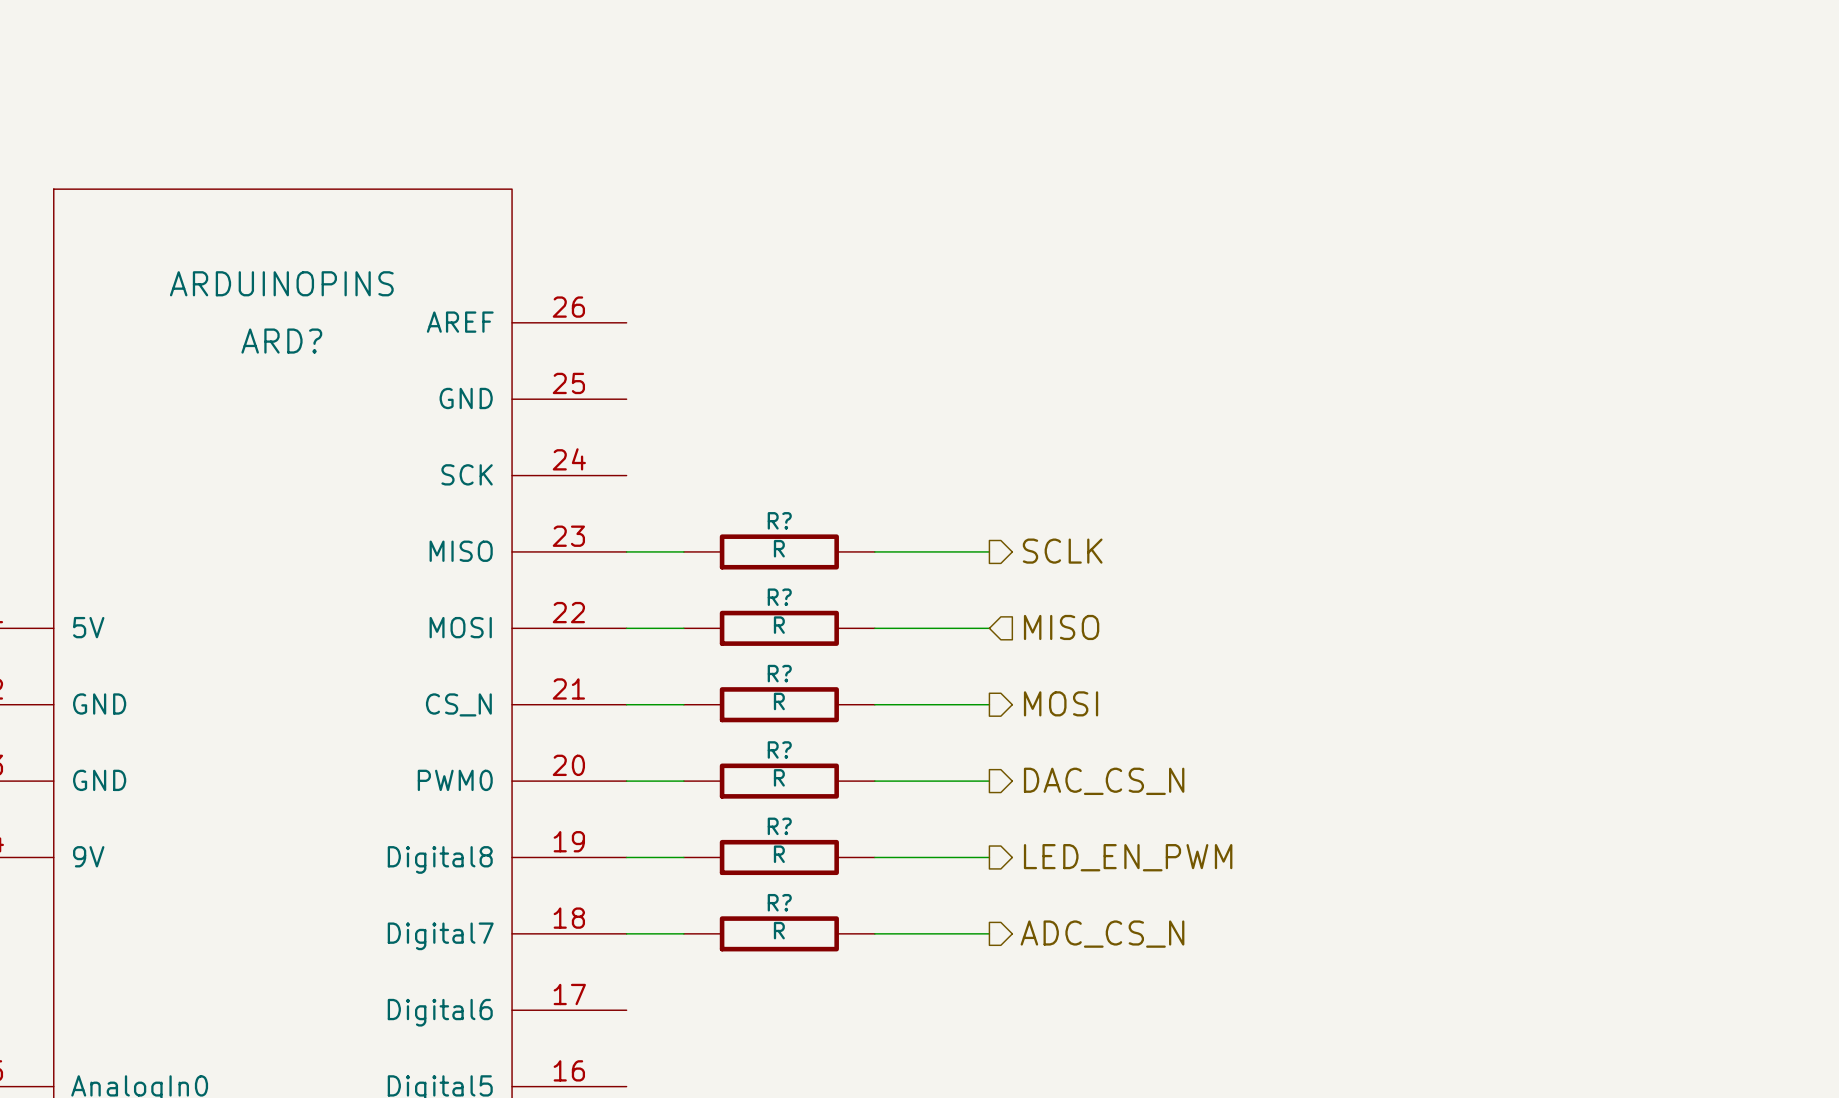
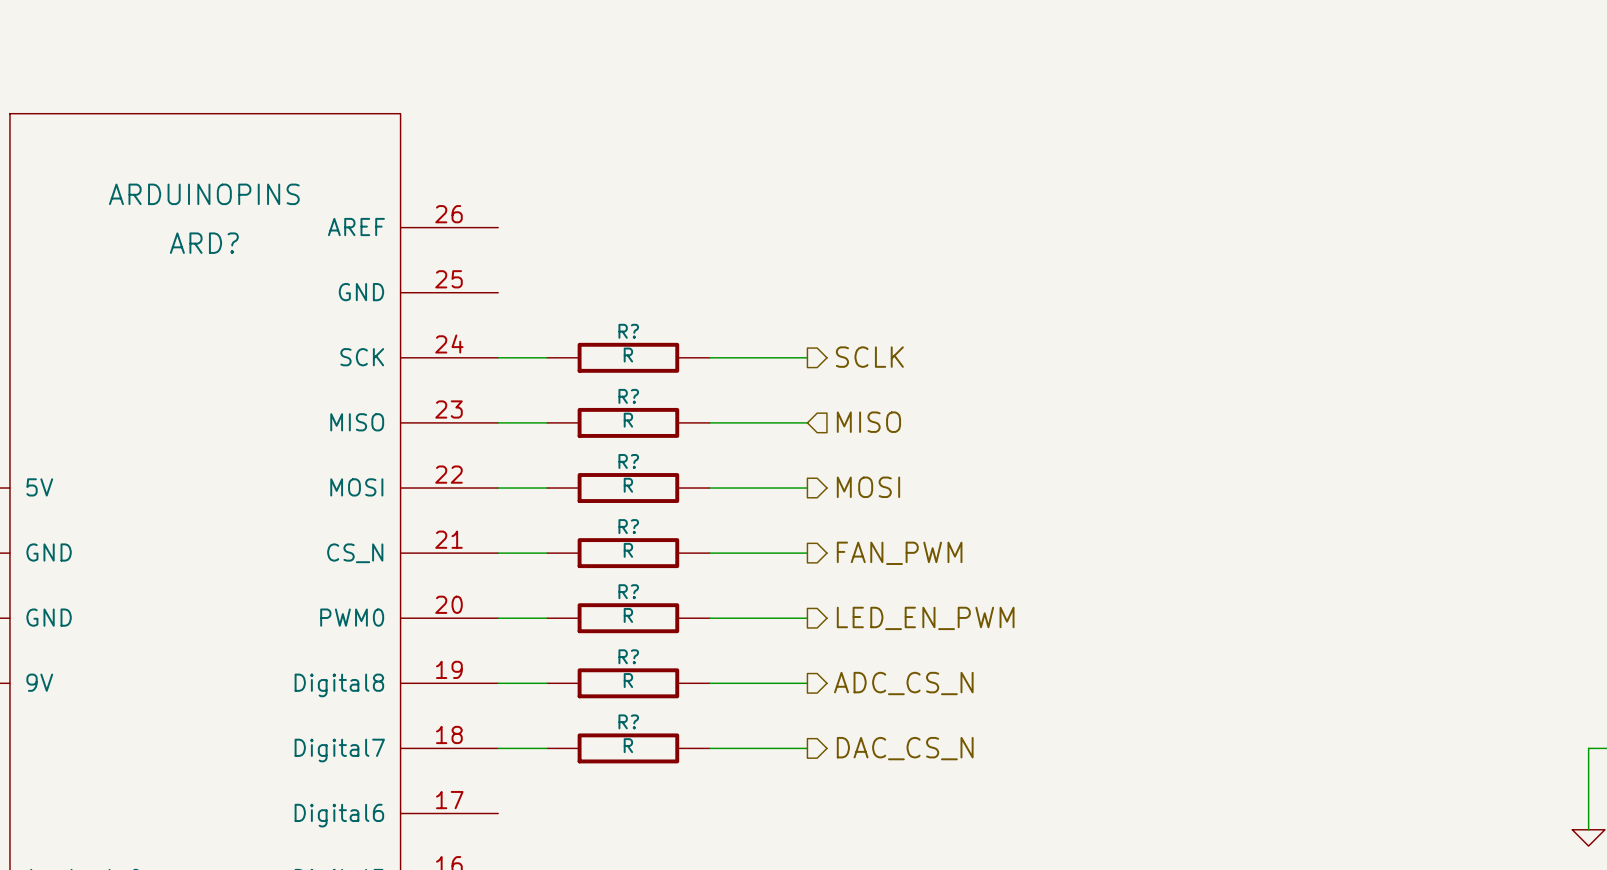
hierarchical label: none -> SCLK (869, 357)
wire: none -> (498, 357) (547, 357)
R?: none -> R (628, 357)
wire: none -> (709, 357) (807, 357)
hierarchical label shape: output (1062, 551) -> input (868, 422)
hierarchical label: SCLK (1062, 551) -> MISO (868, 422)
hierarchical label shape: input (1061, 627) -> output (868, 487)
hierarchical label: MISO (1061, 627) -> MOSI (868, 487)
hierarchical label: MOSI (1061, 703) -> FAN_PWM (899, 553)
hierarchical label: DAC_CS_N (1104, 781) -> LED_EN_PWM (925, 618)
hierarchical label: LED_EN_PWM (1128, 857) -> ADC_CS_N (903, 683)
hierarchical label: ADC_CS_N (1102, 934) -> DAC_CS_N (905, 748)

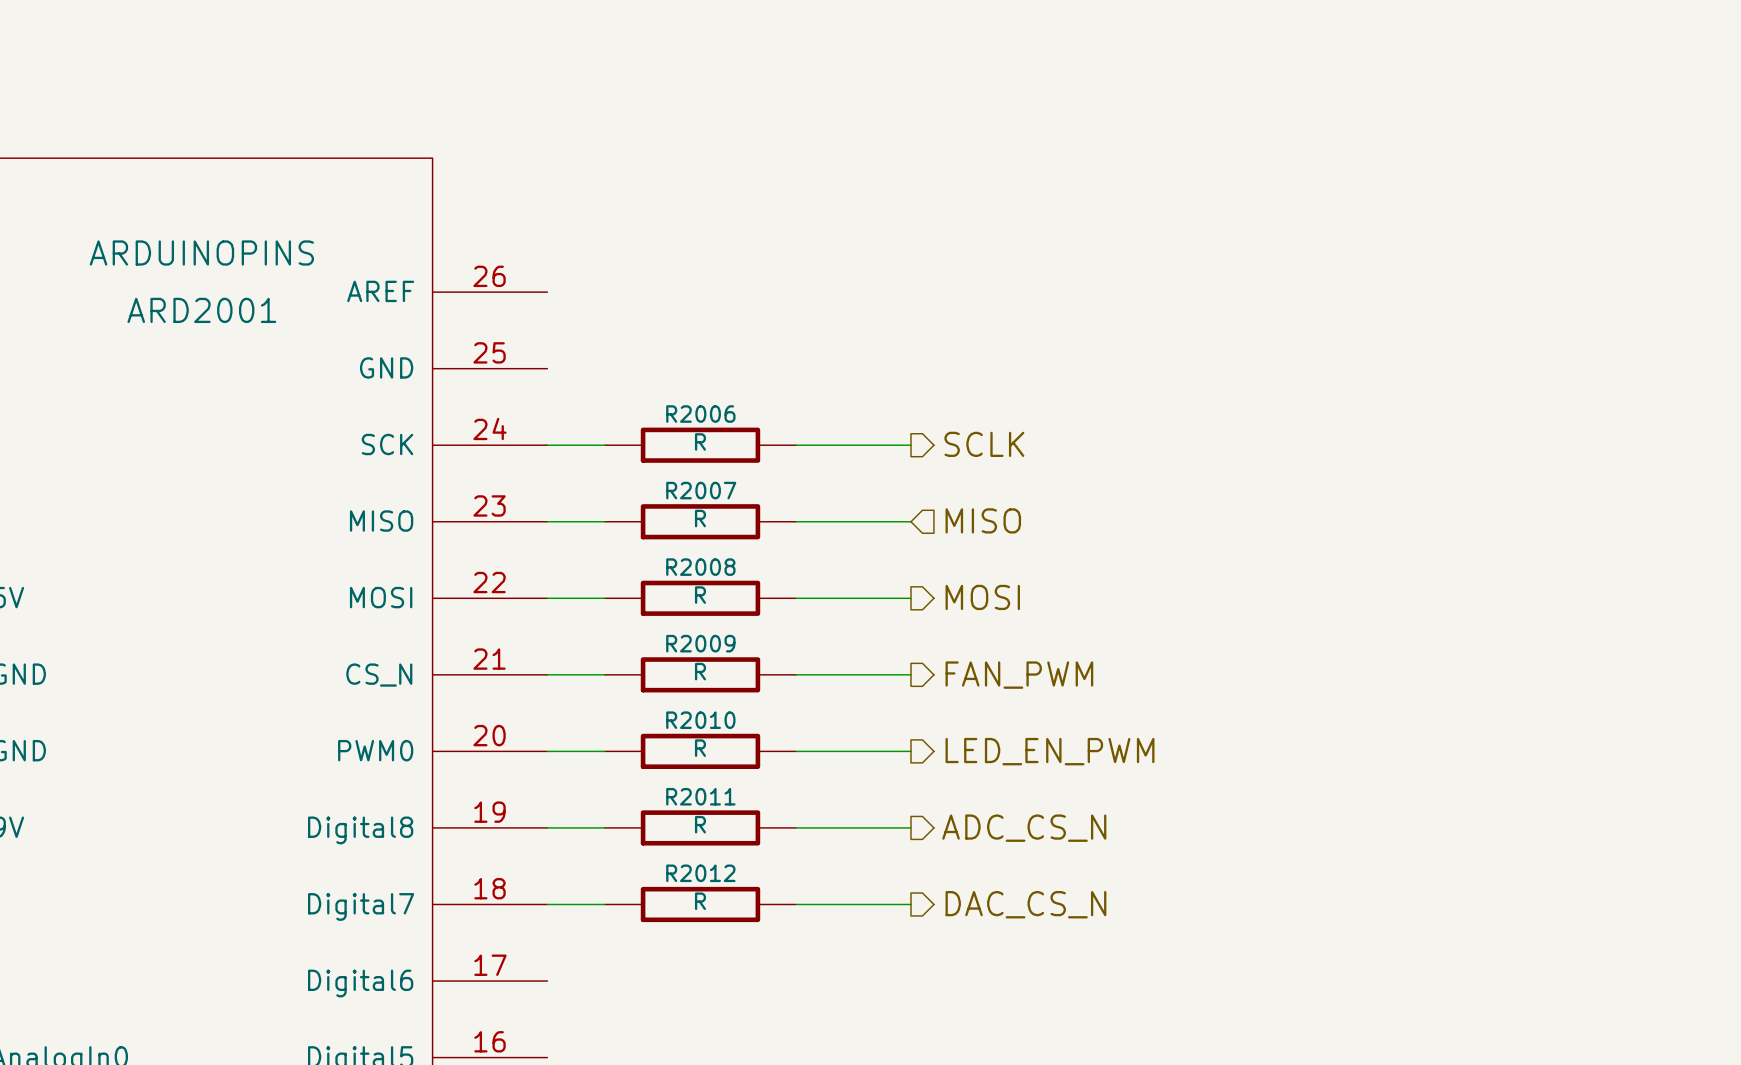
ARD? name: ARD? (204, 243) -> ARD2001 (201, 310)
R? name: R? (628, 331) -> R2006 (700, 414)
R? name: R? (628, 396) -> R2007 (701, 490)
R? name: R? (628, 461) -> R2008 (700, 567)
R? name: R? (628, 526) -> R2009 (700, 643)
R? name: R? (628, 591) -> R2010 (700, 720)
R? name: R? (628, 656) -> R2011 (700, 796)
R? name: R? (628, 721) -> R2012 (700, 873)

